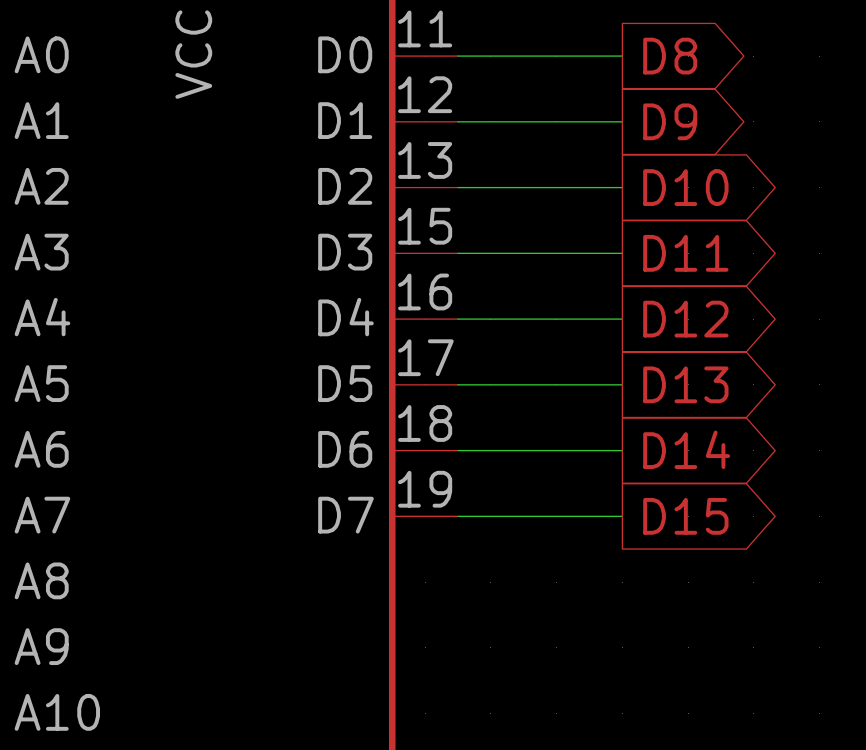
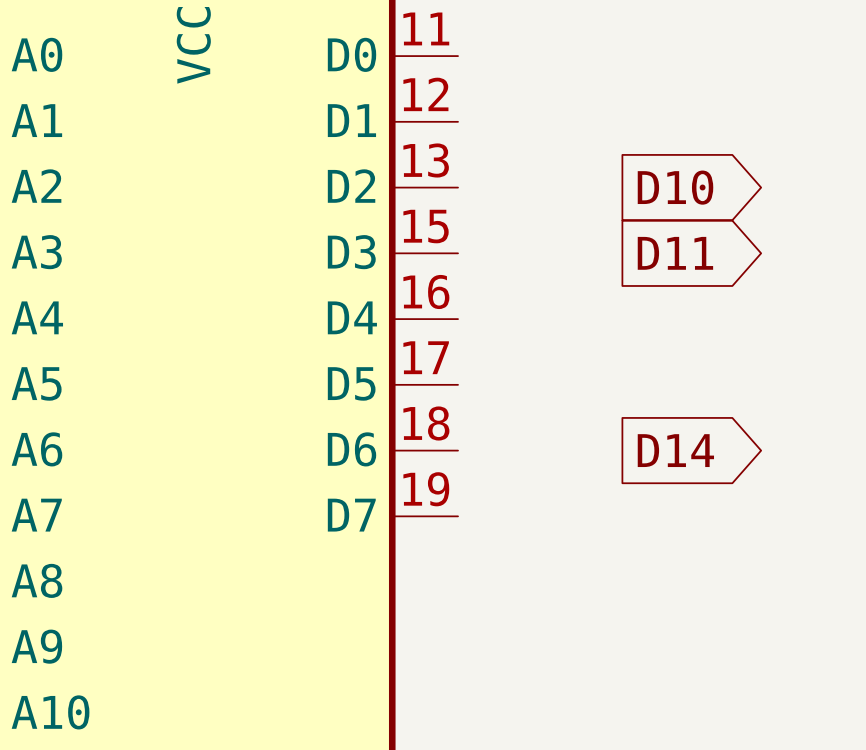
wire: (458, 56) (622, 56) -> none
global label: D8 (670, 56) -> none
wire: (458, 121) (622, 121) -> none
global label: D9 (670, 121) -> none
wire: (458, 187) (622, 187) -> none
wire: (458, 253) (622, 253) -> none
wire: (458, 319) (622, 319) -> none
global label: D12 (685, 319) -> none
wire: (458, 384) (622, 384) -> none
global label: D13 (685, 384) -> none
wire: (458, 450) (622, 450) -> none
wire: (458, 516) (622, 516) -> none
global label: D15 (685, 516) -> none

